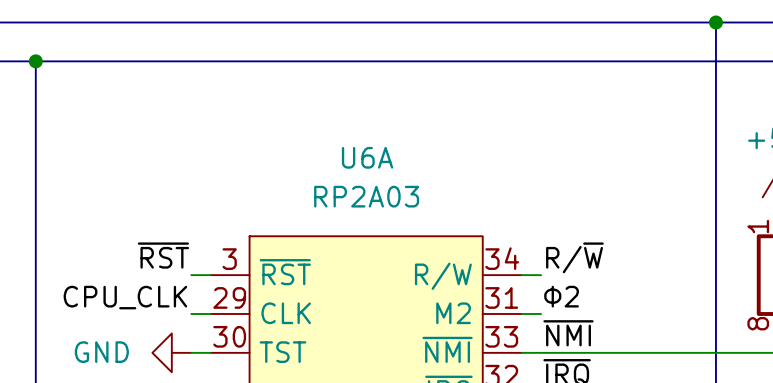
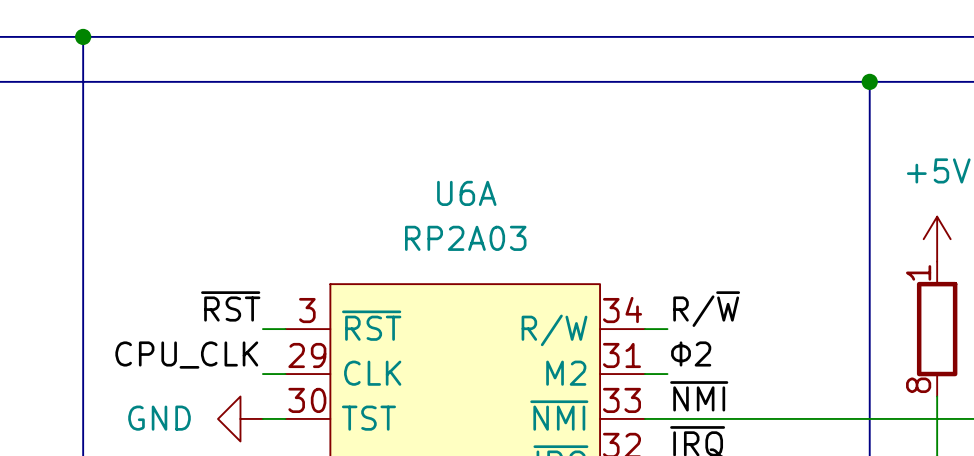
bus: none -> (83, 36) (83, 81)
bus: (715, 22) (715, 61) -> none
junction position: (715, 22) -> (869, 81)
junction position: (35, 61) -> (83, 36)

